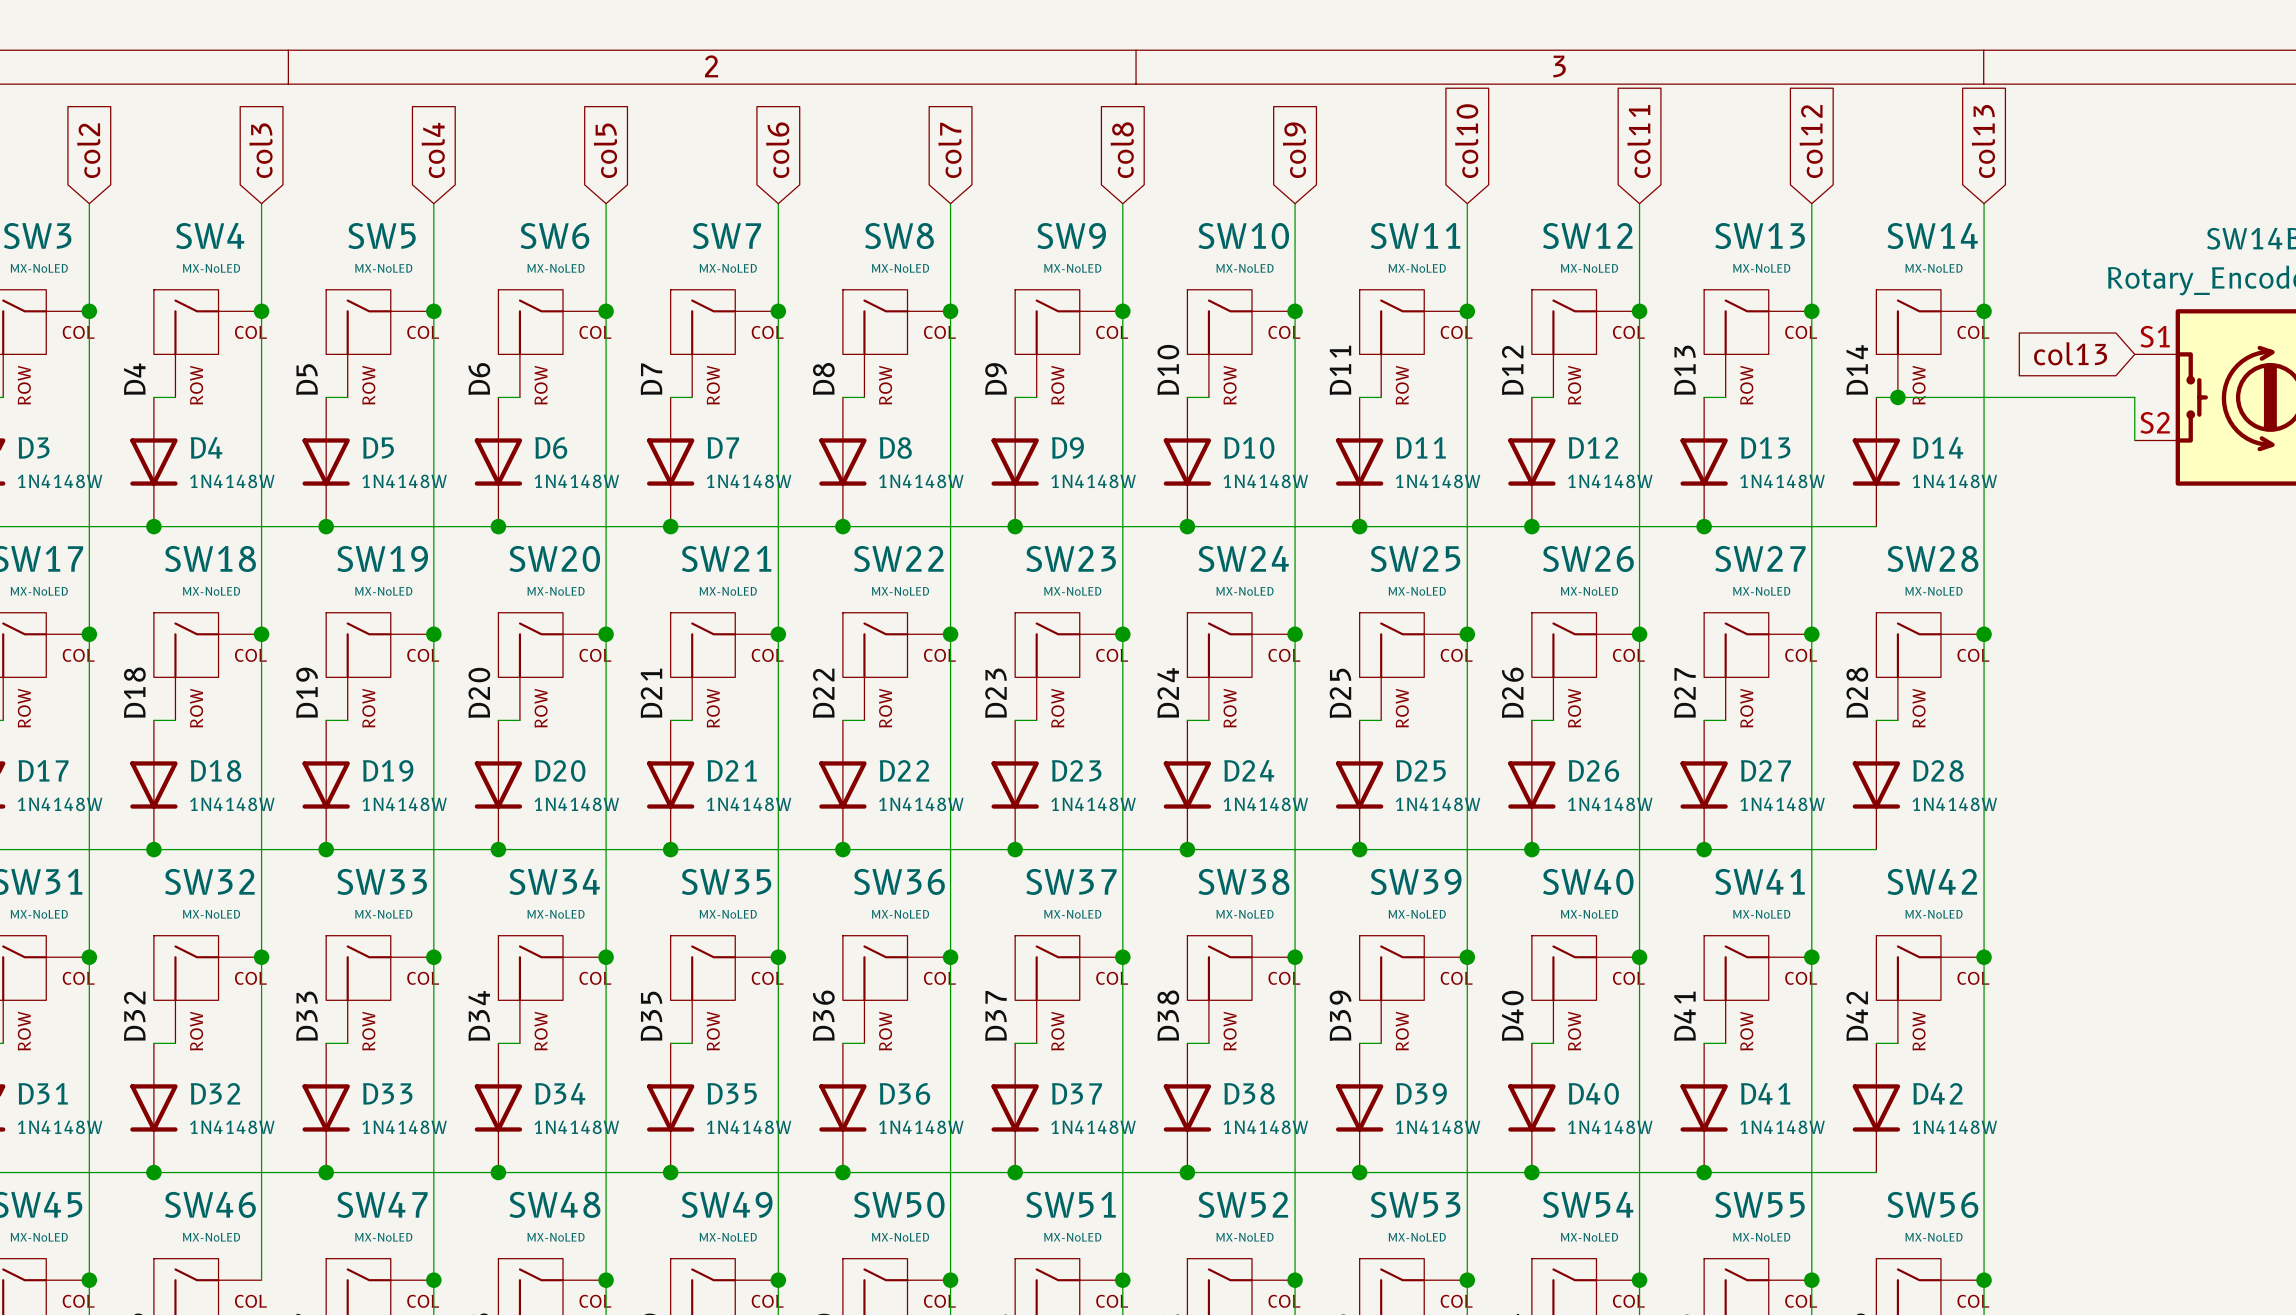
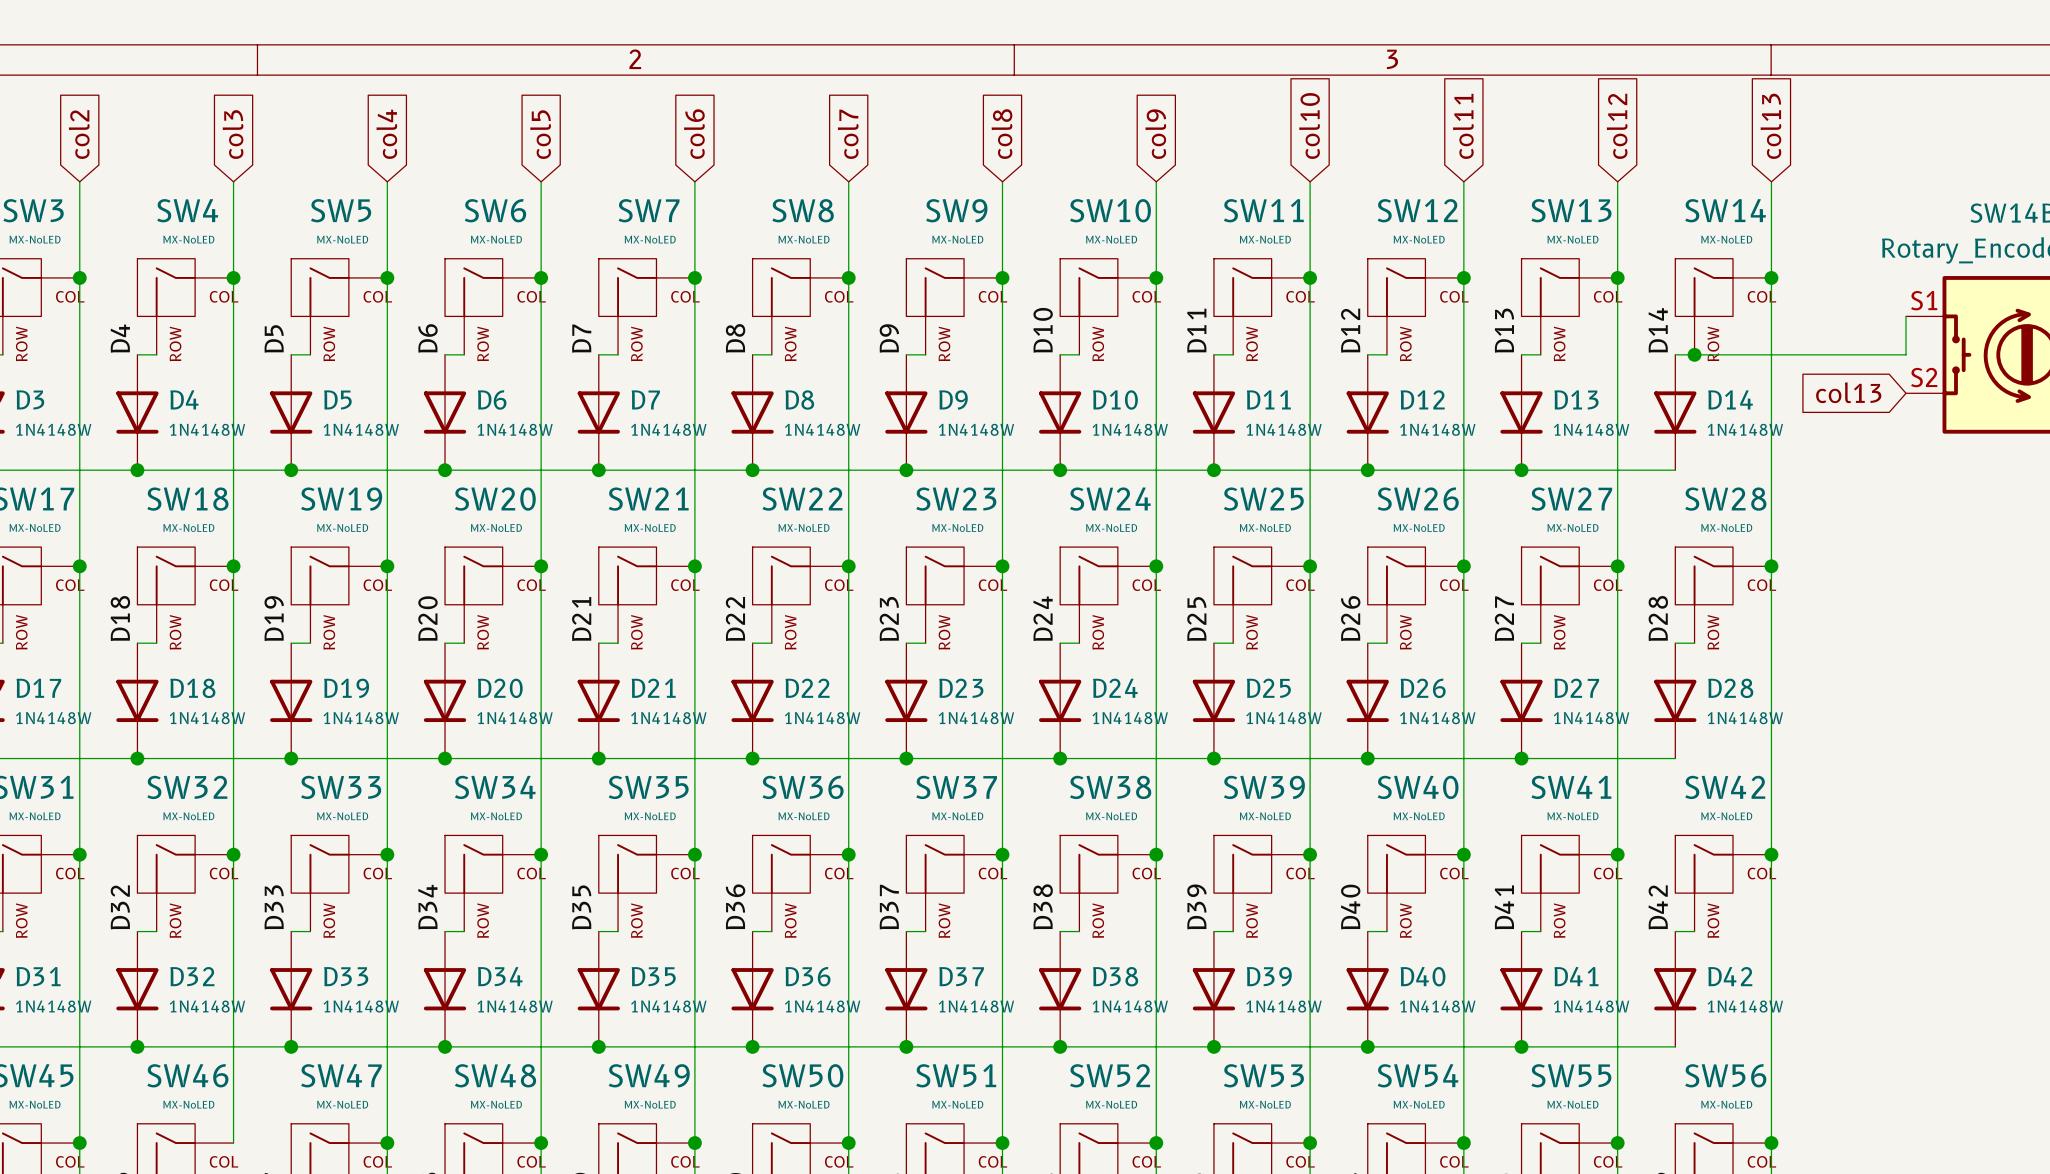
global label position: col13 (2070, 353) -> col13 (1848, 392)
wire: (2134, 397) (2134, 440) -> (1906, 354) (1906, 316)

